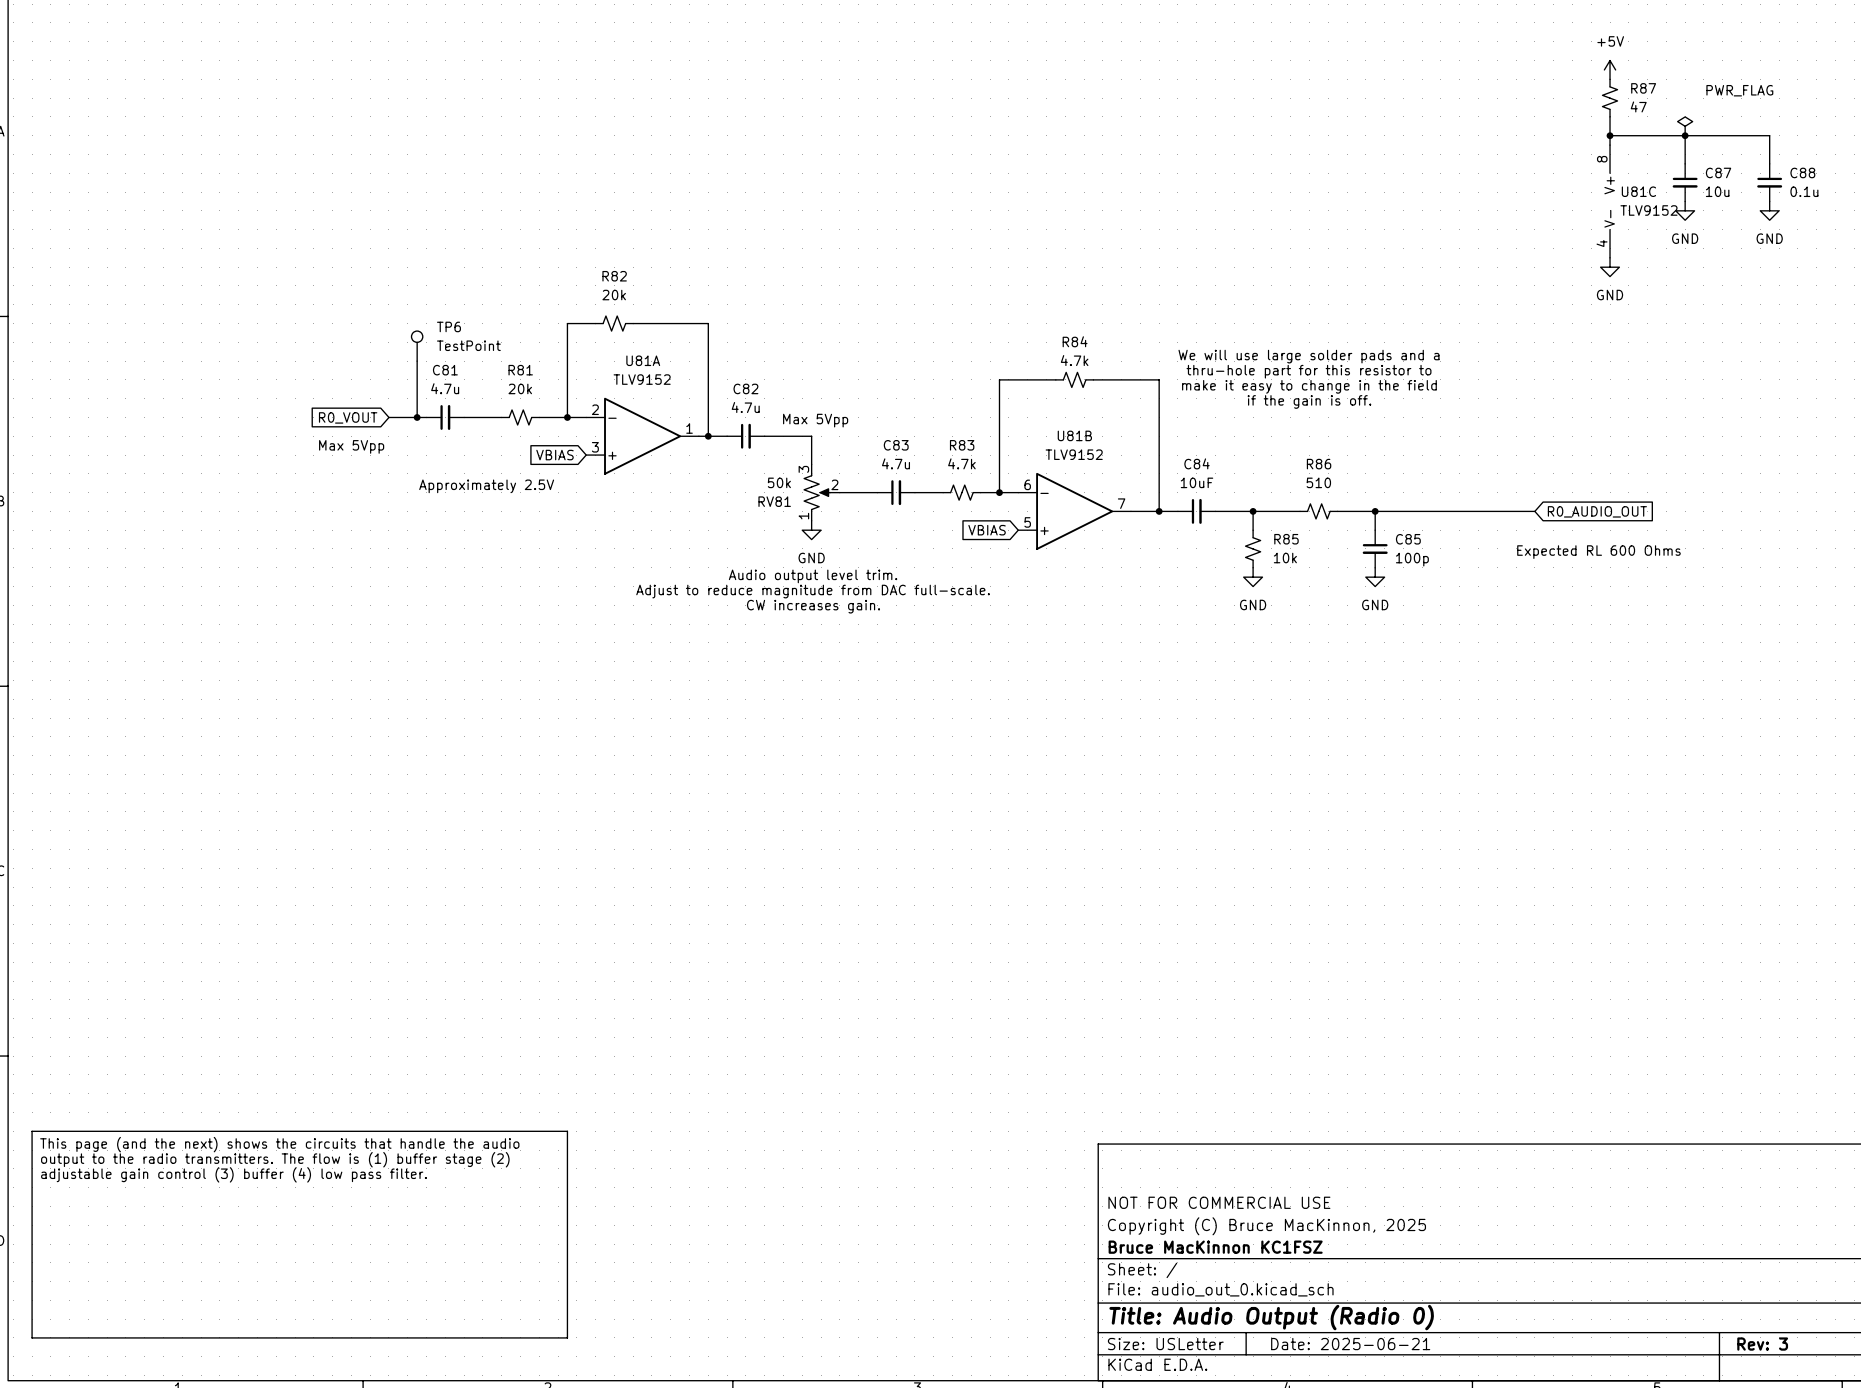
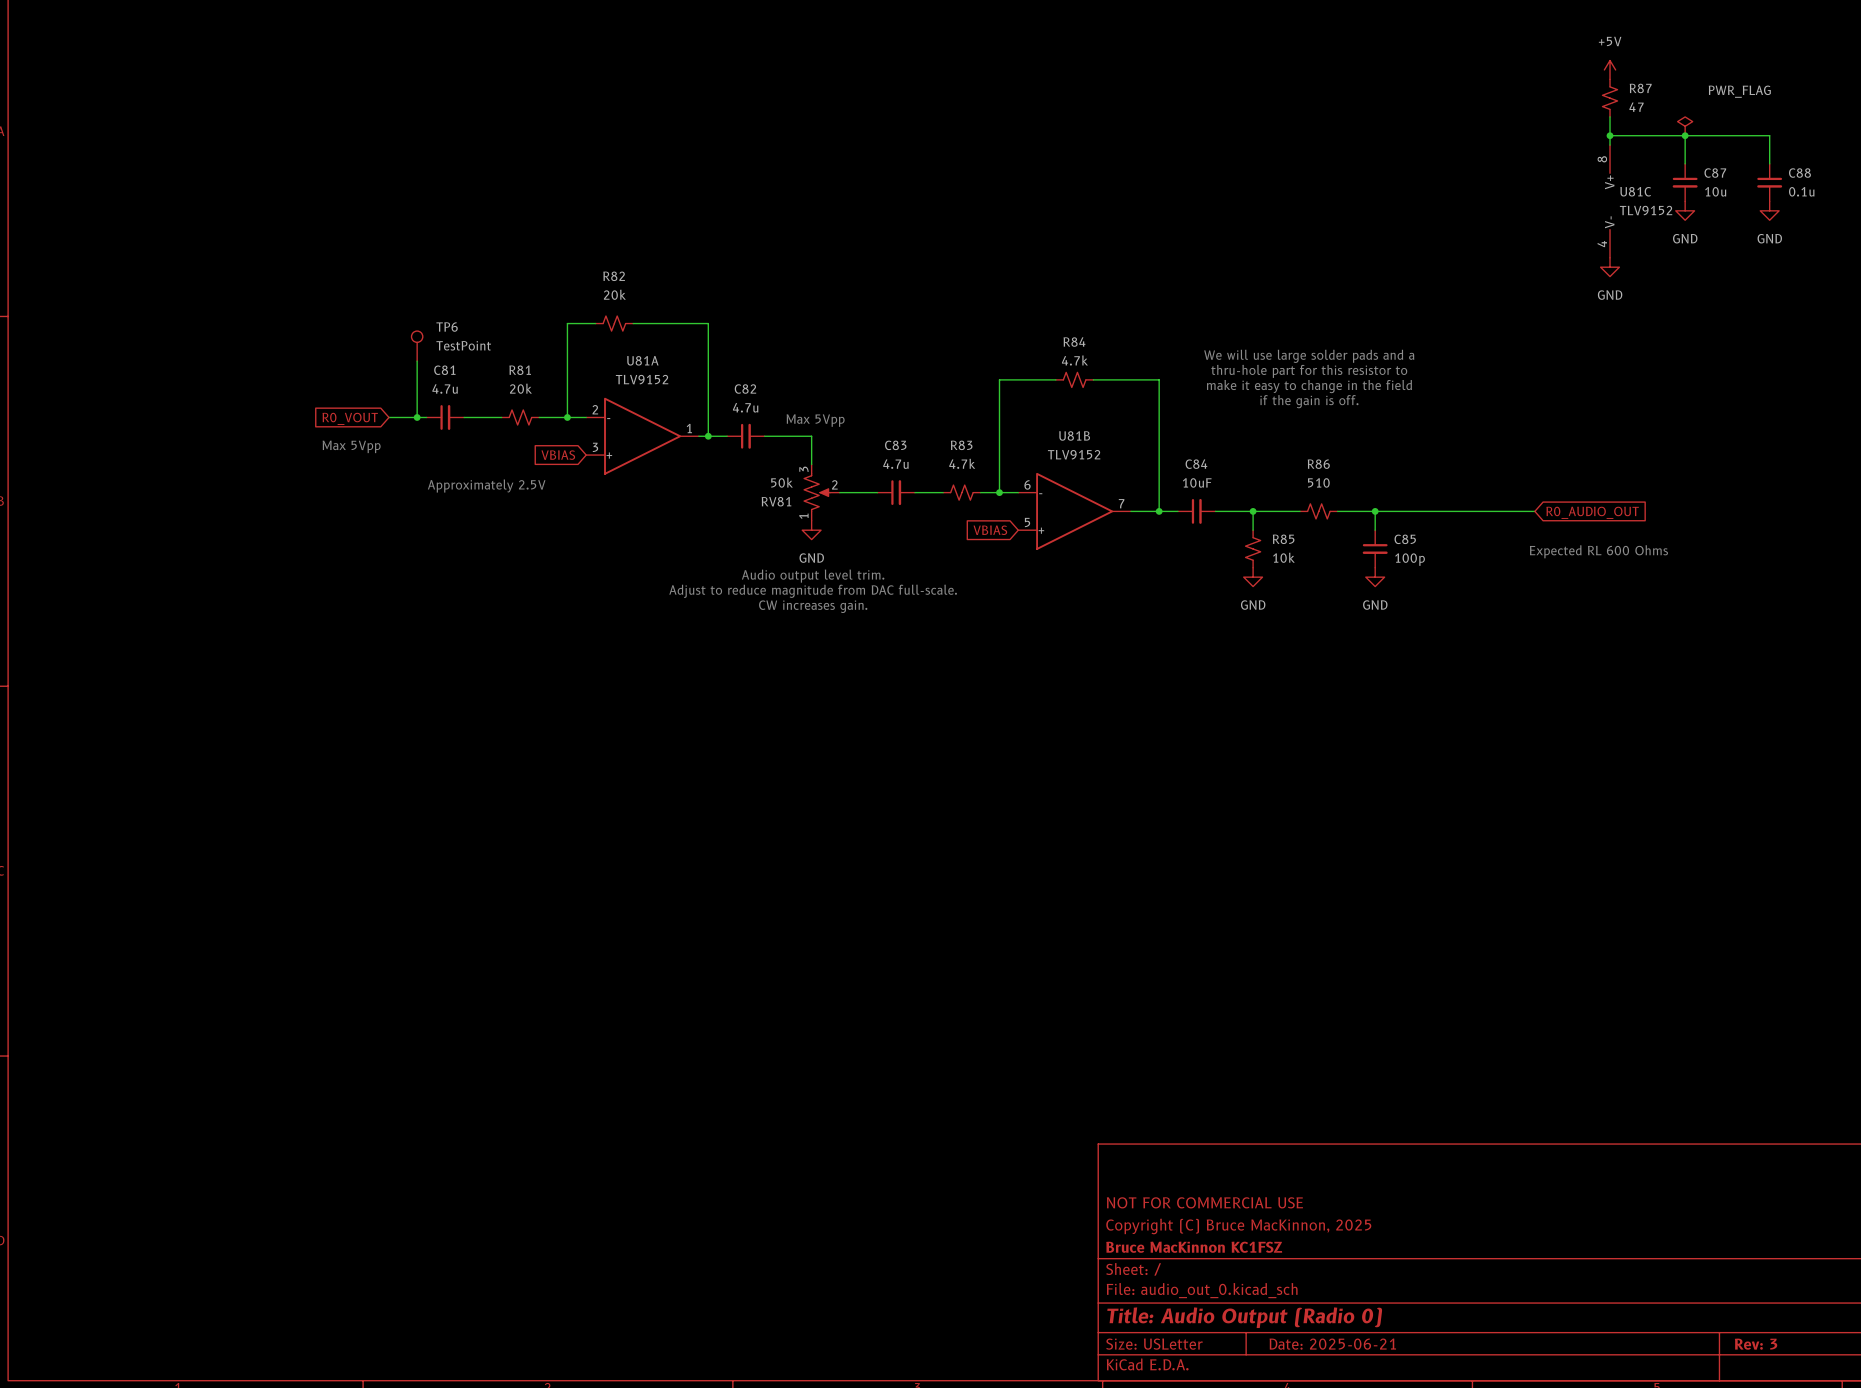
line: (32, 1131) (567, 1131) (567, 1337) (32, 1337) (32, 1131) -> none
text: This page (and the next) shows the circuits that handle the audio (279, 1144) -> none
text: output to the radio transmitters. The flow is (1) buffer stage (2) (275, 1159) -> none
text: adjustable gain control (3) buffer (4) low pass filter. (233, 1174) -> none

